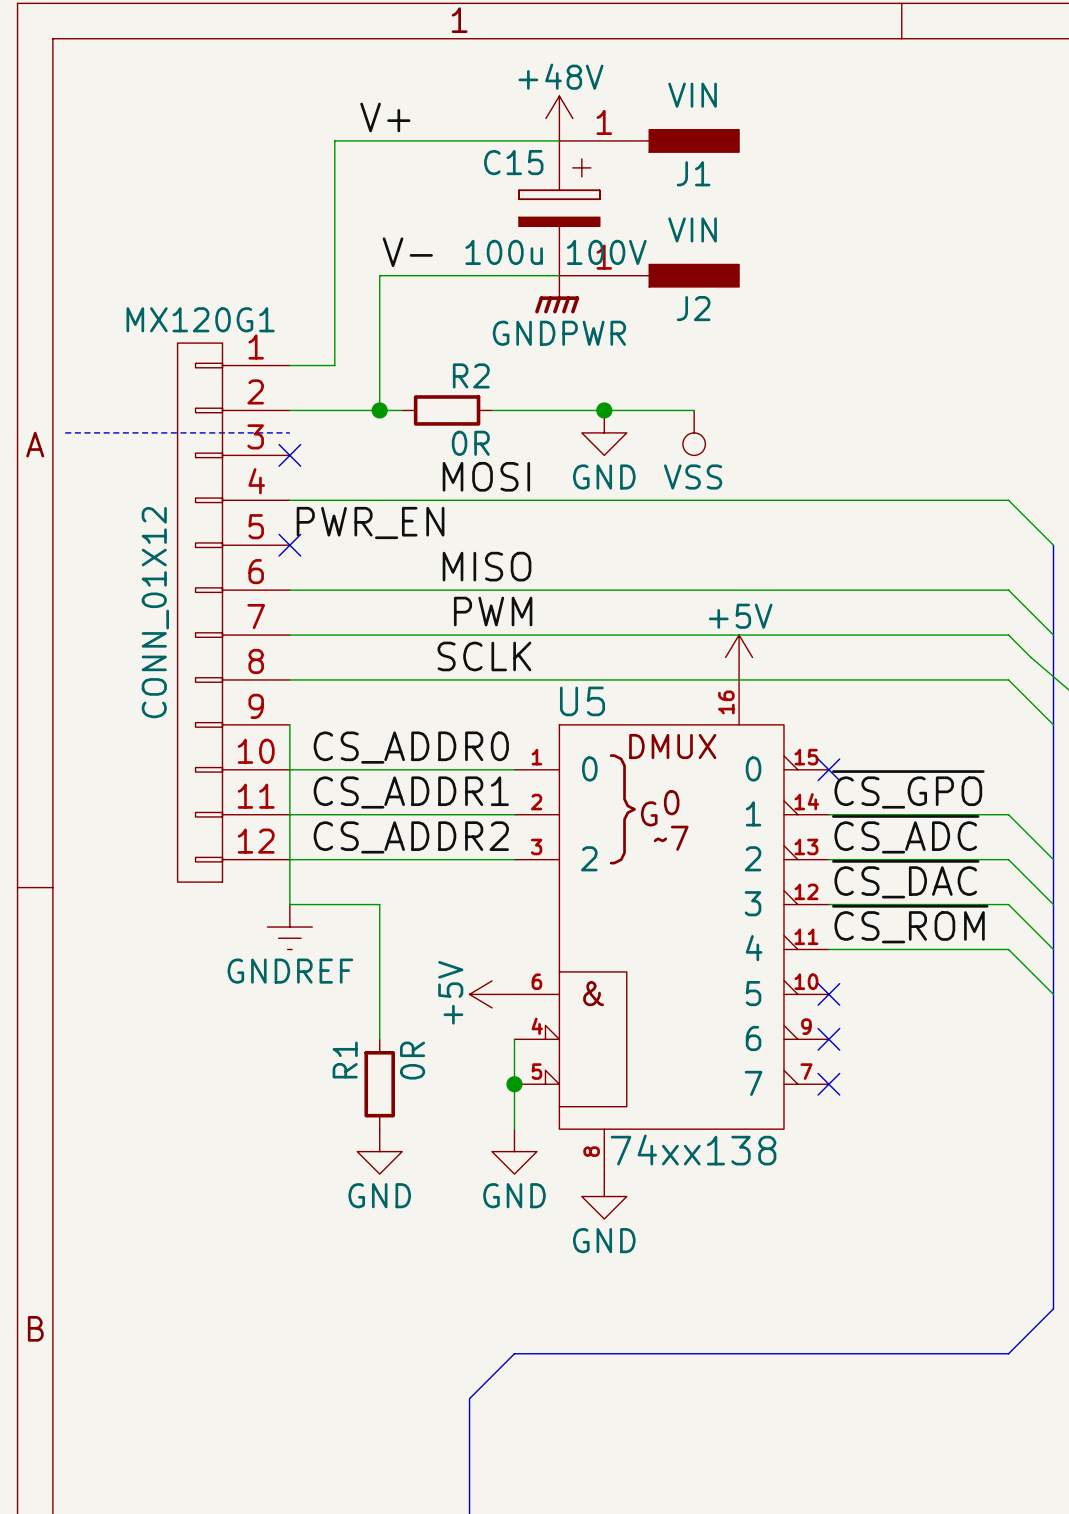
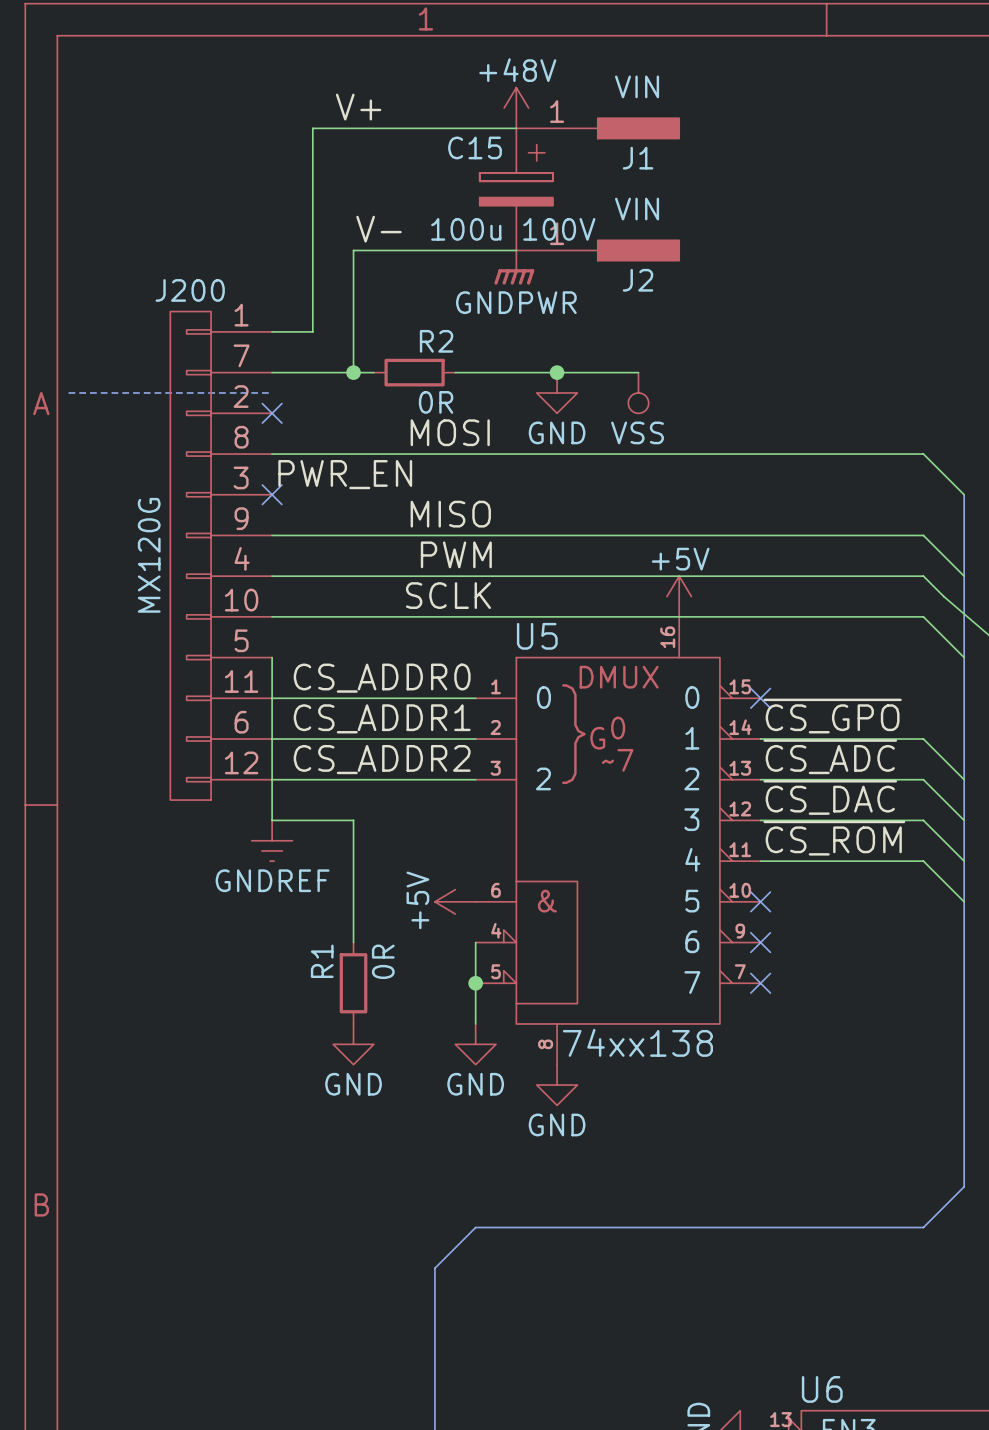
MX120G1 name: MX120G1 (200, 319) -> J200 (190, 290)
MX120G1 symbol: [177, 343, 290, 883] -> [170, 311, 273, 801]
MX120G1 value: CONN_01X12 (155, 612) -> MX120G (149, 555)

